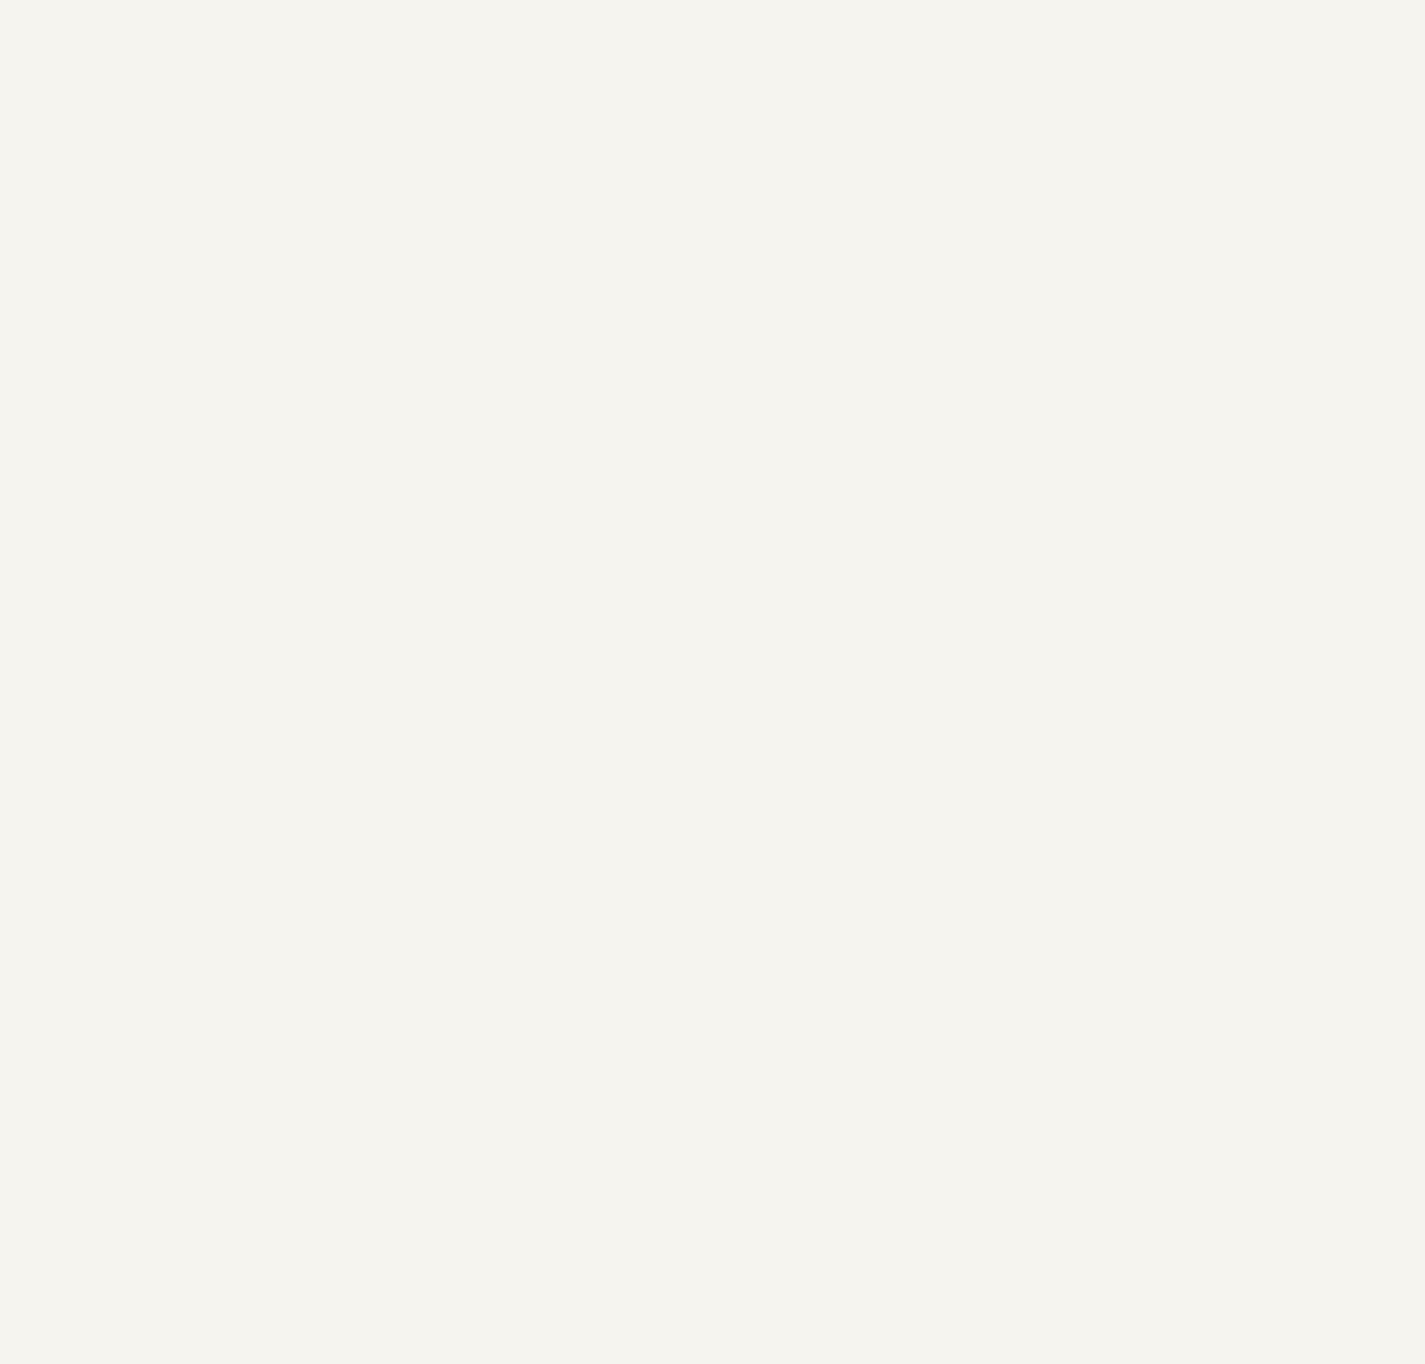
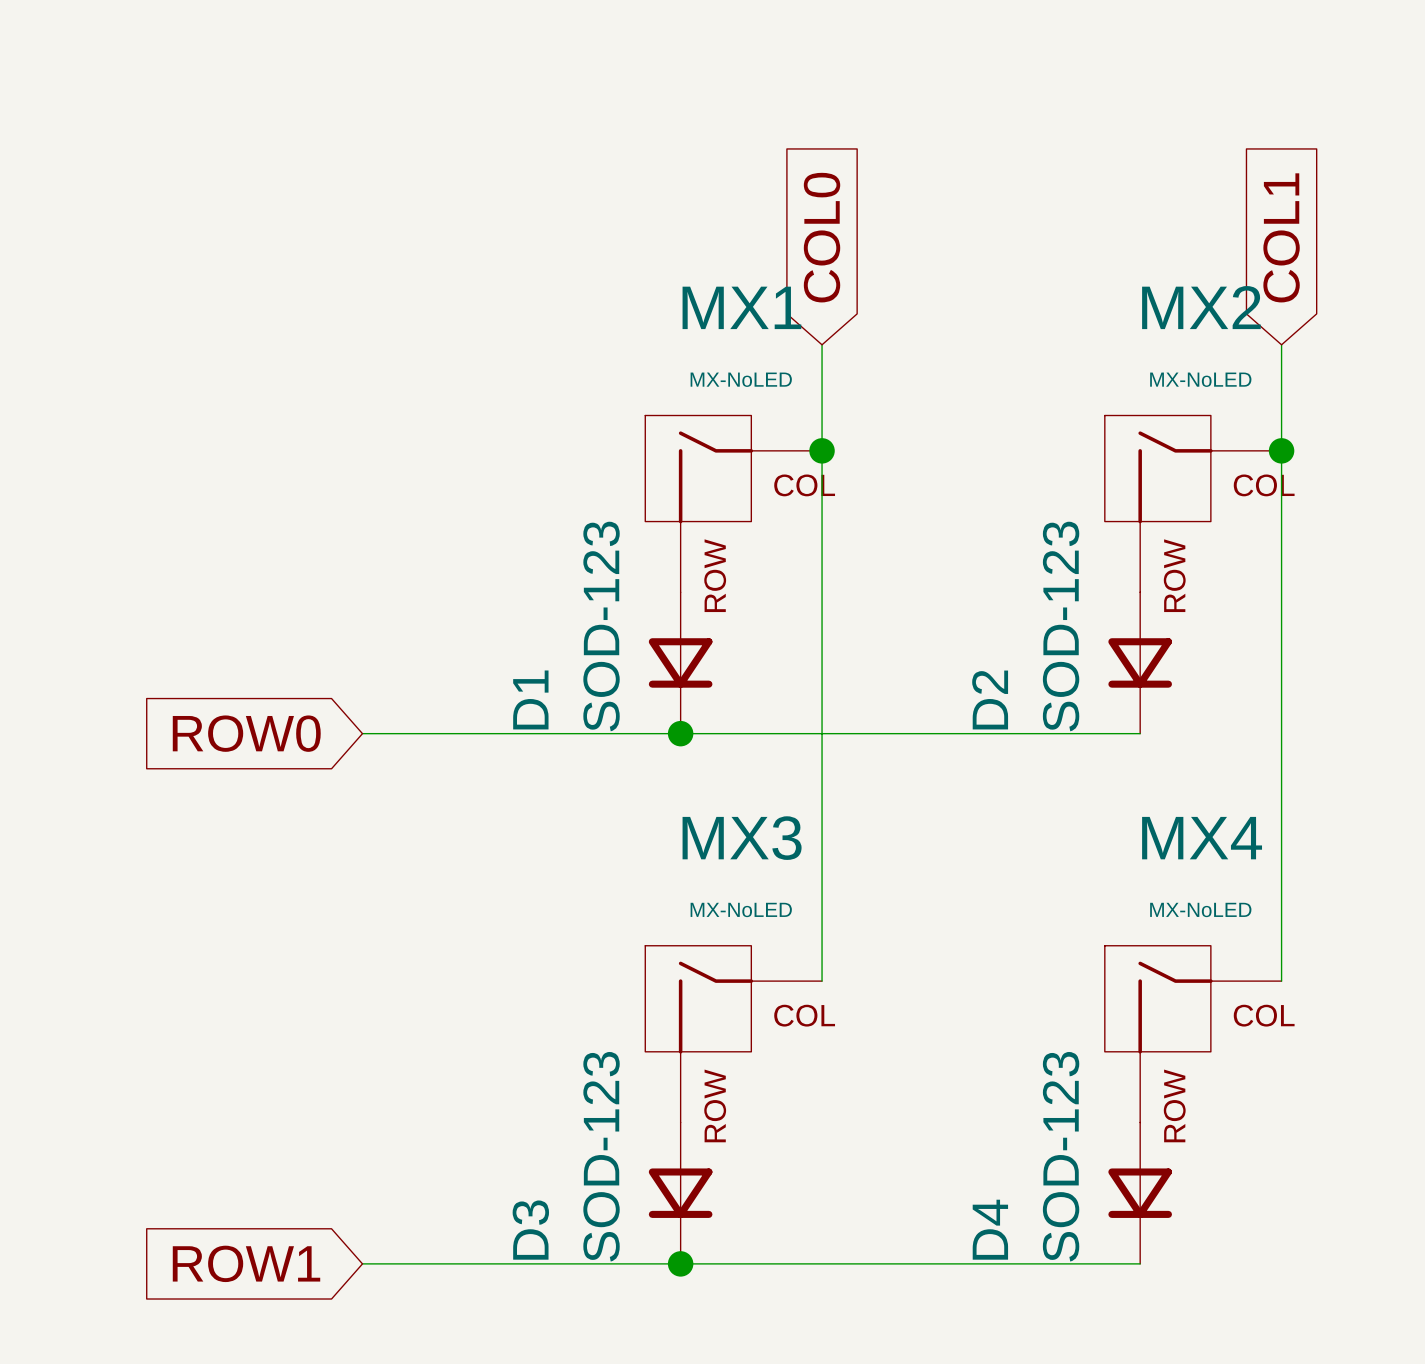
global label: none -> COL0 (822, 237)
global label: none -> COL1 (1281, 237)
wire: none -> (822, 344) (822, 981)
wire: none -> (1281, 344) (1281, 981)
junction: none -> (822, 450)
junction: none -> (1281, 450)
MX1: none -> MX-NoLED (733, 503)
MX2: none -> MX-NoLED (1193, 503)
D1: none -> SOD-123 (680, 662)
D2: none -> SOD-123 (1140, 662)
global label: none -> ROW0 (246, 733)
wire: none -> (362, 733) (1140, 733)
junction: none -> (680, 733)
MX3: none -> MX-NoLED (733, 1034)
MX4: none -> MX-NoLED (1193, 1034)
D3: none -> SOD-123 (680, 1193)
D4: none -> SOD-123 (1140, 1193)
global label: none -> ROW1 (246, 1263)
wire: none -> (362, 1263) (1140, 1263)
junction: none -> (680, 1263)

